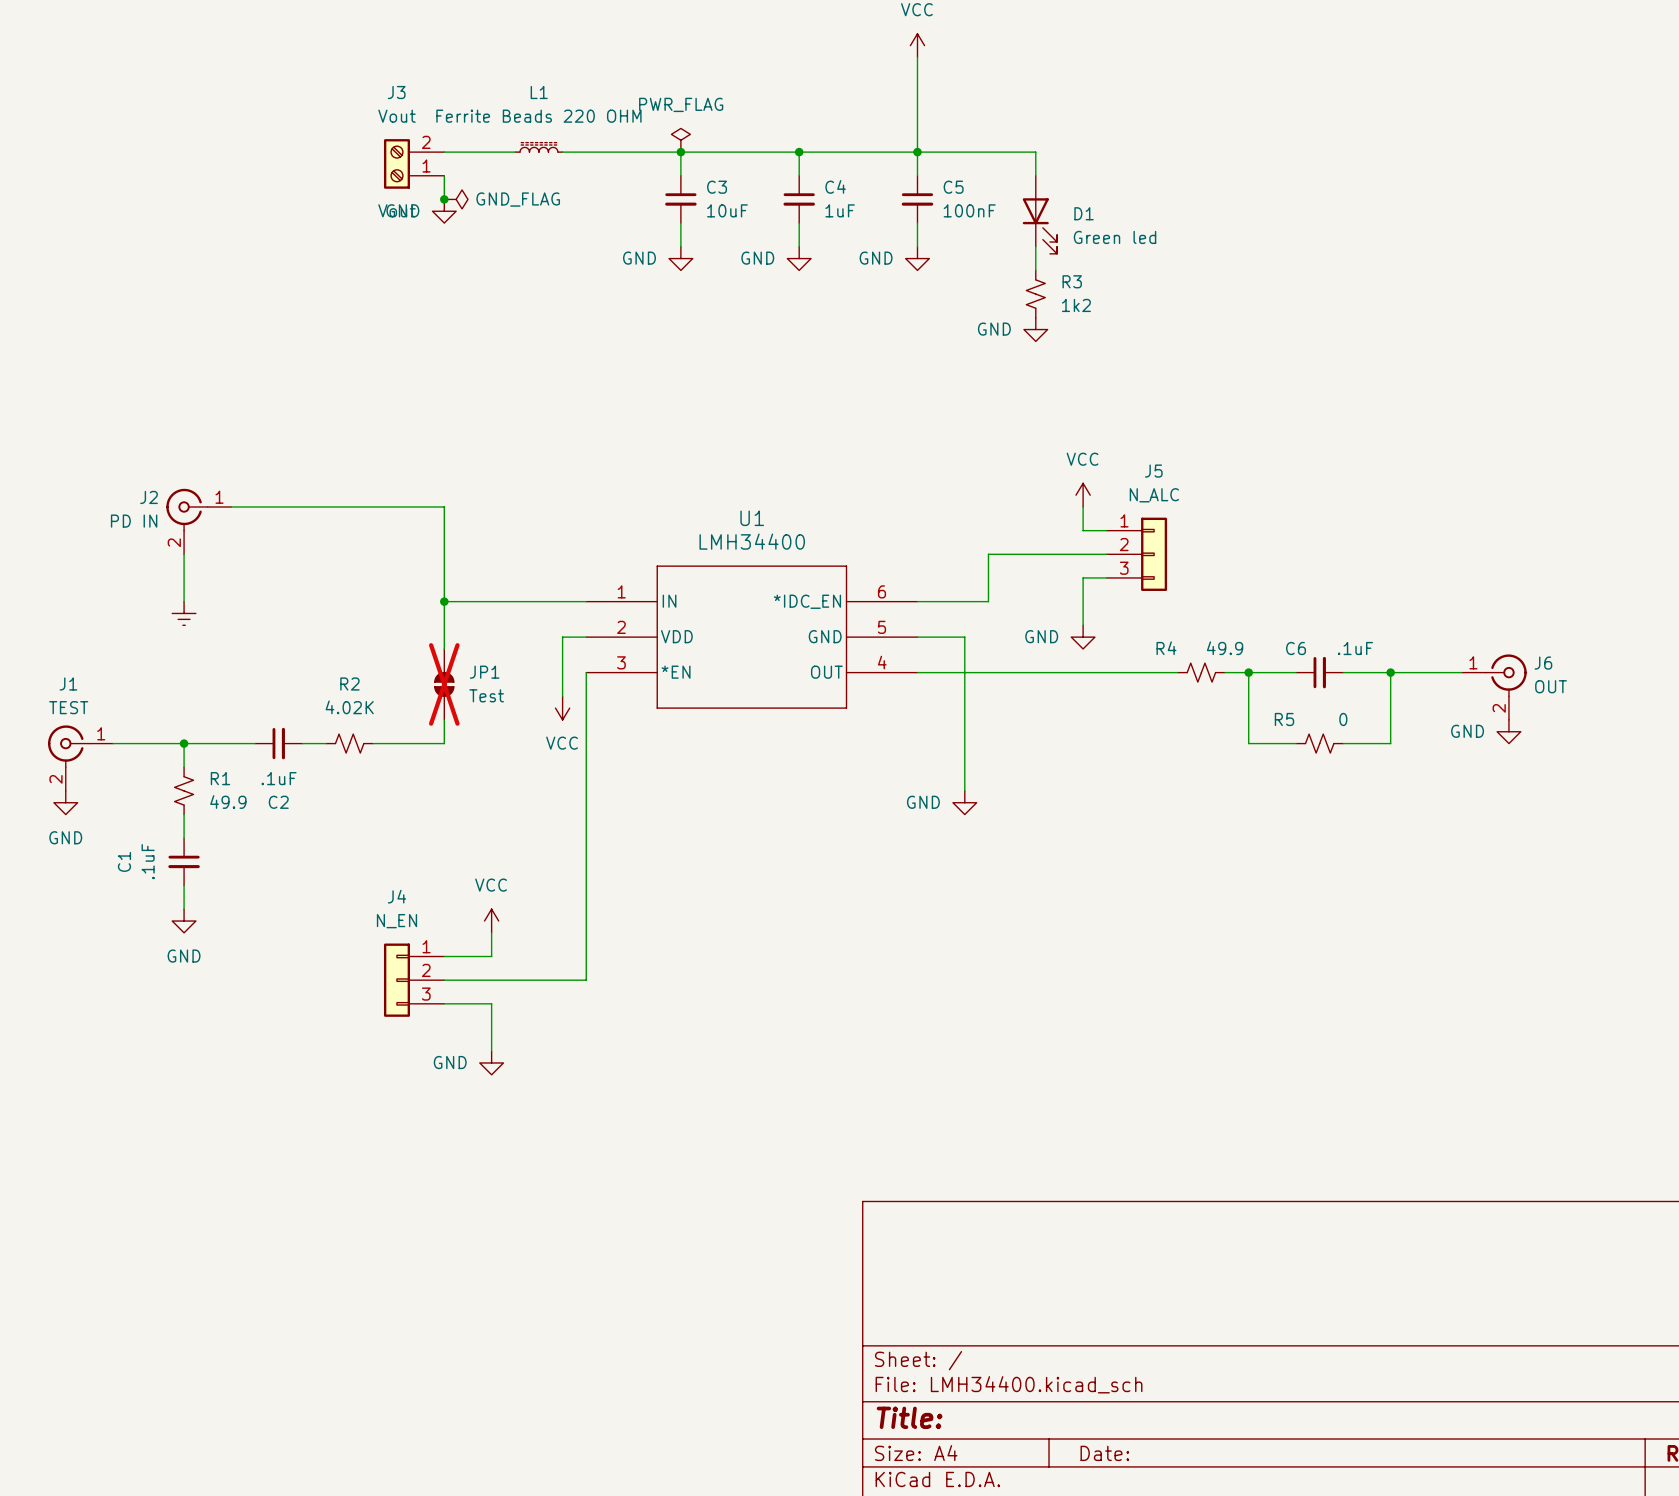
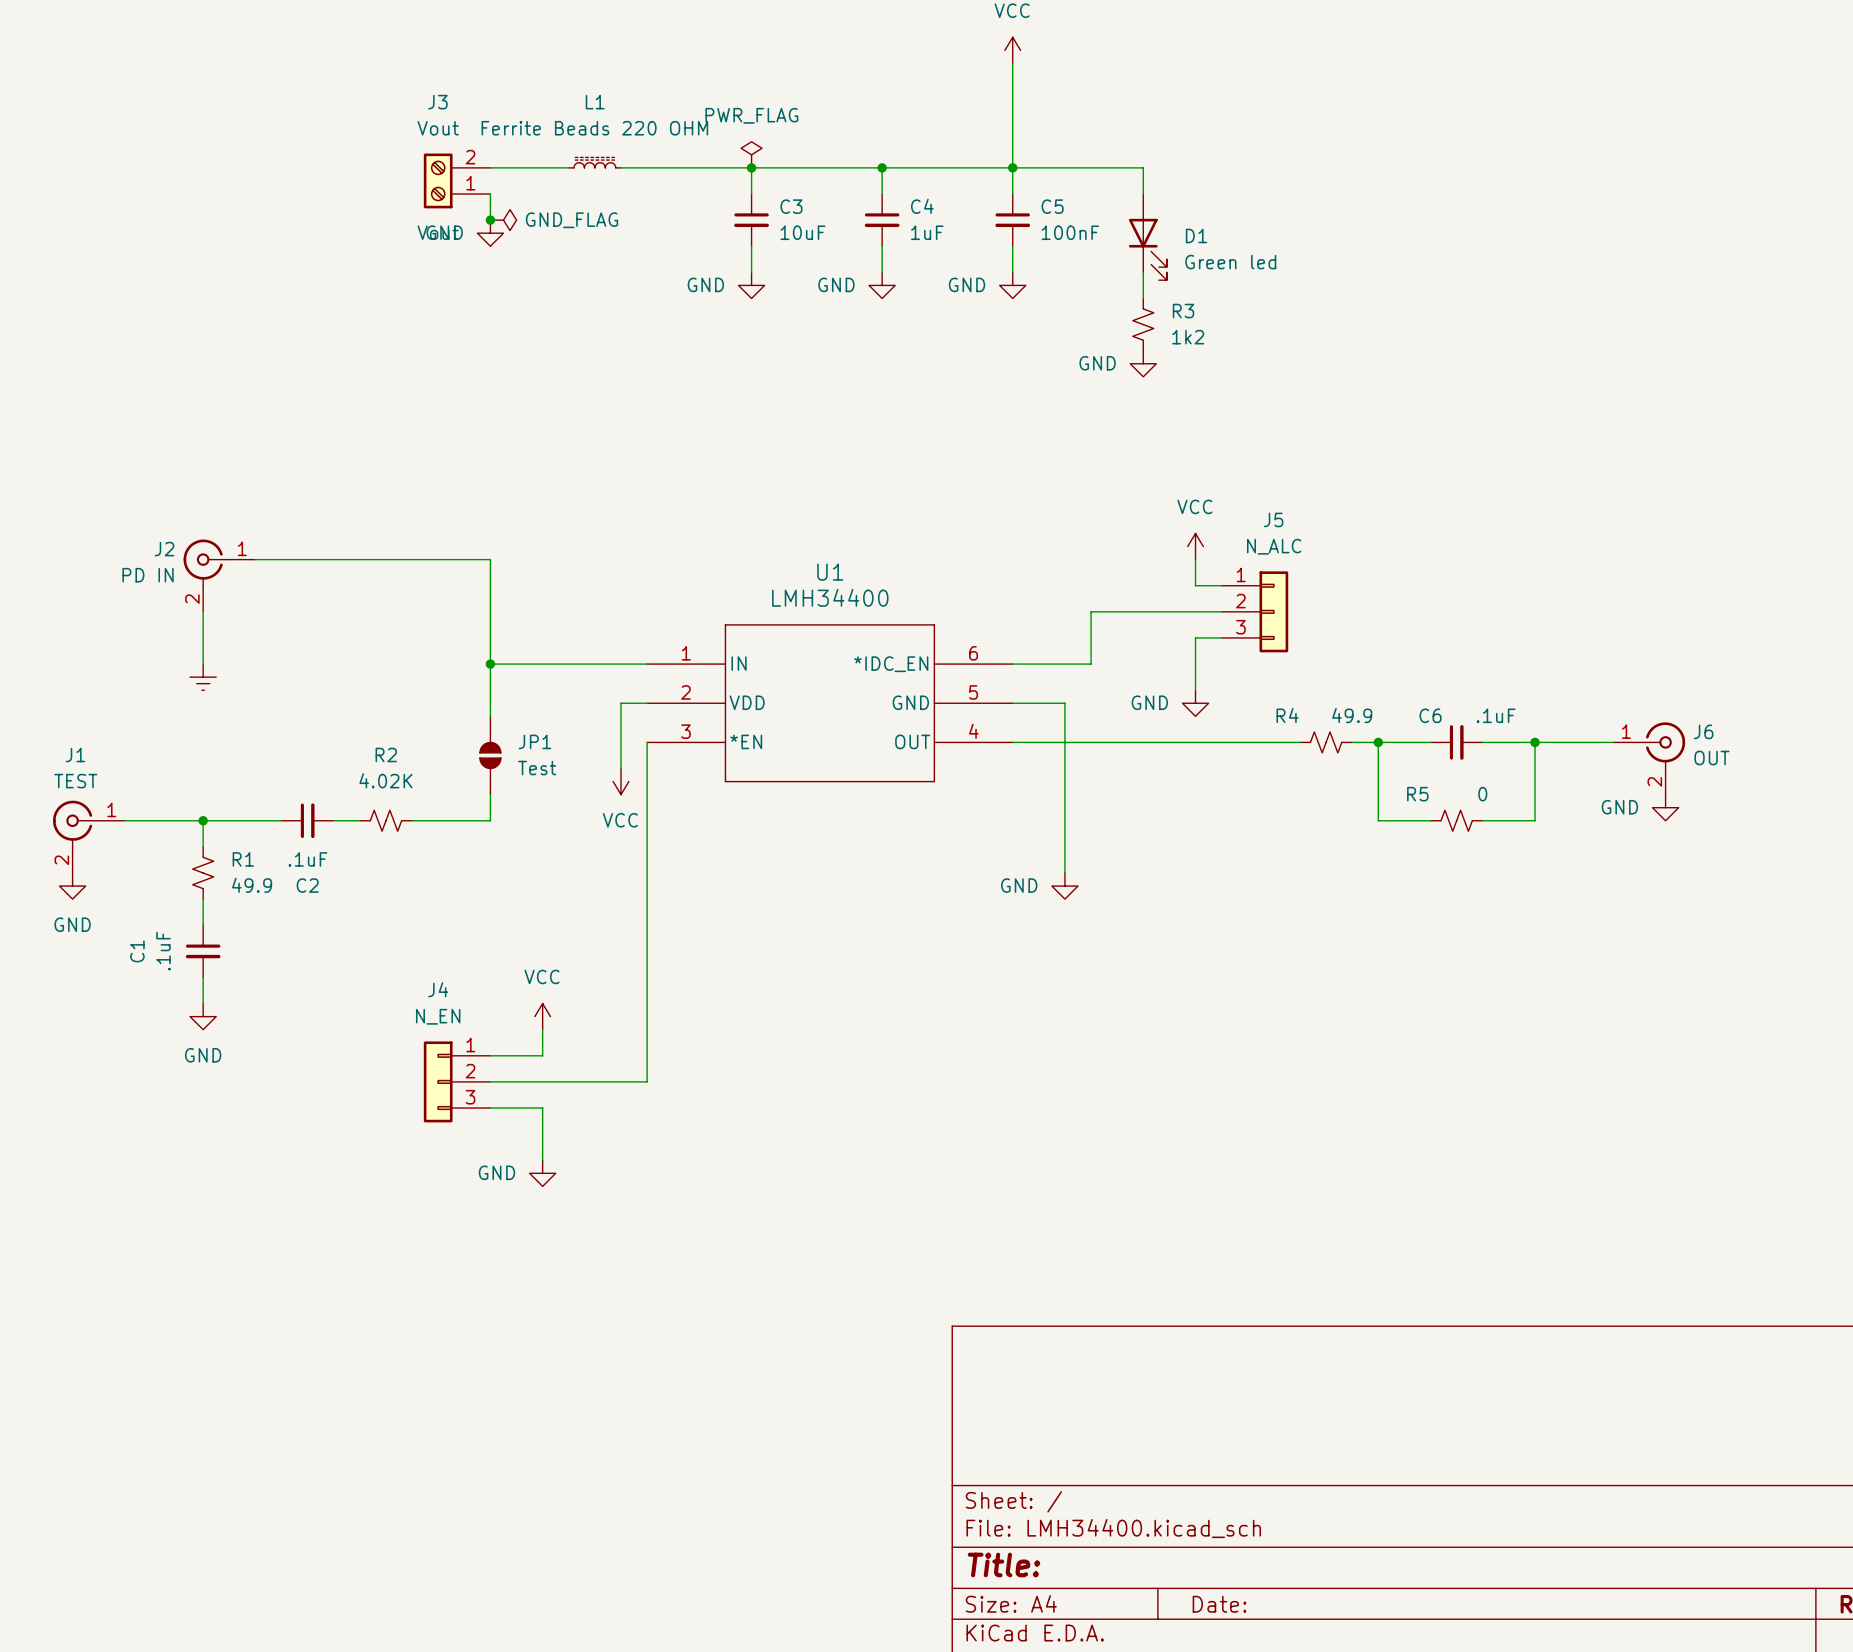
JP1 do-not-place cross: (444, 684) -> none

